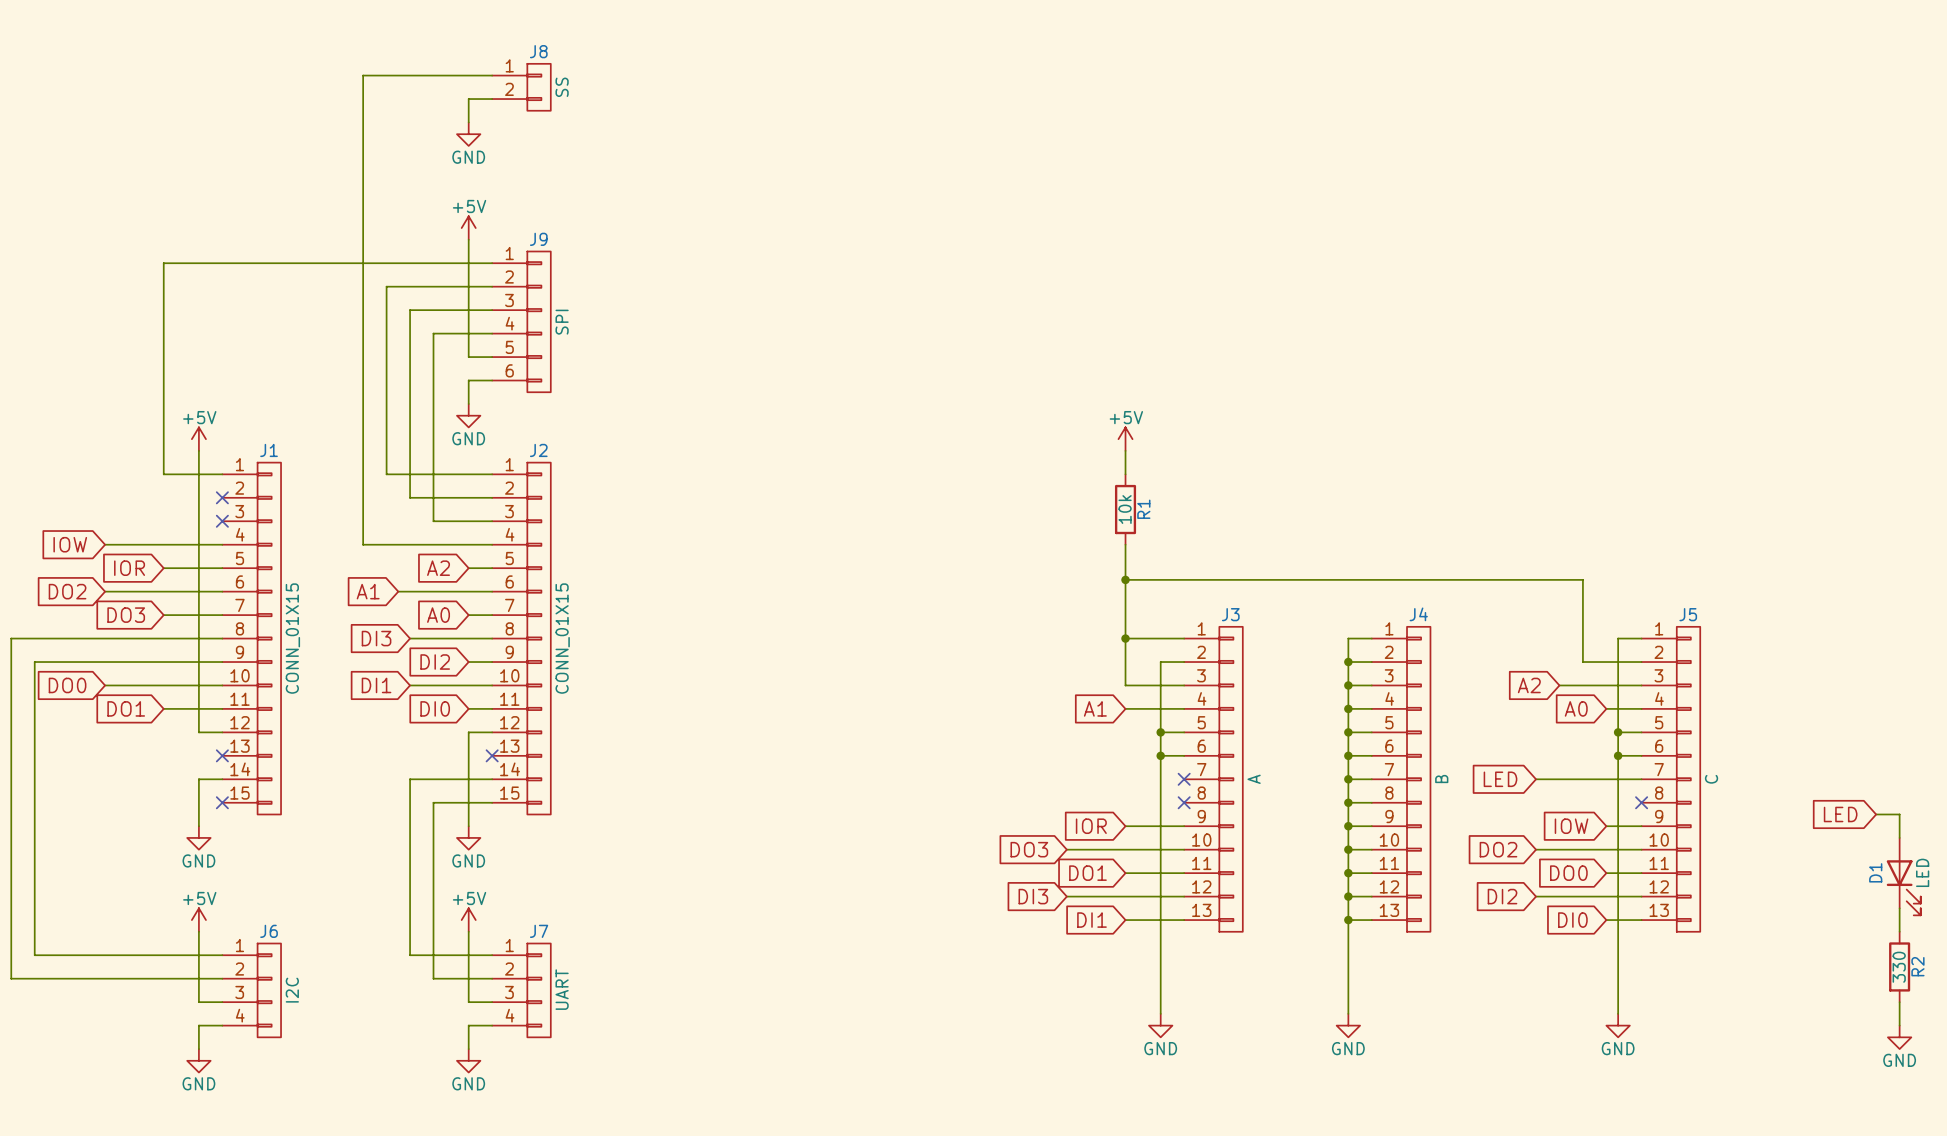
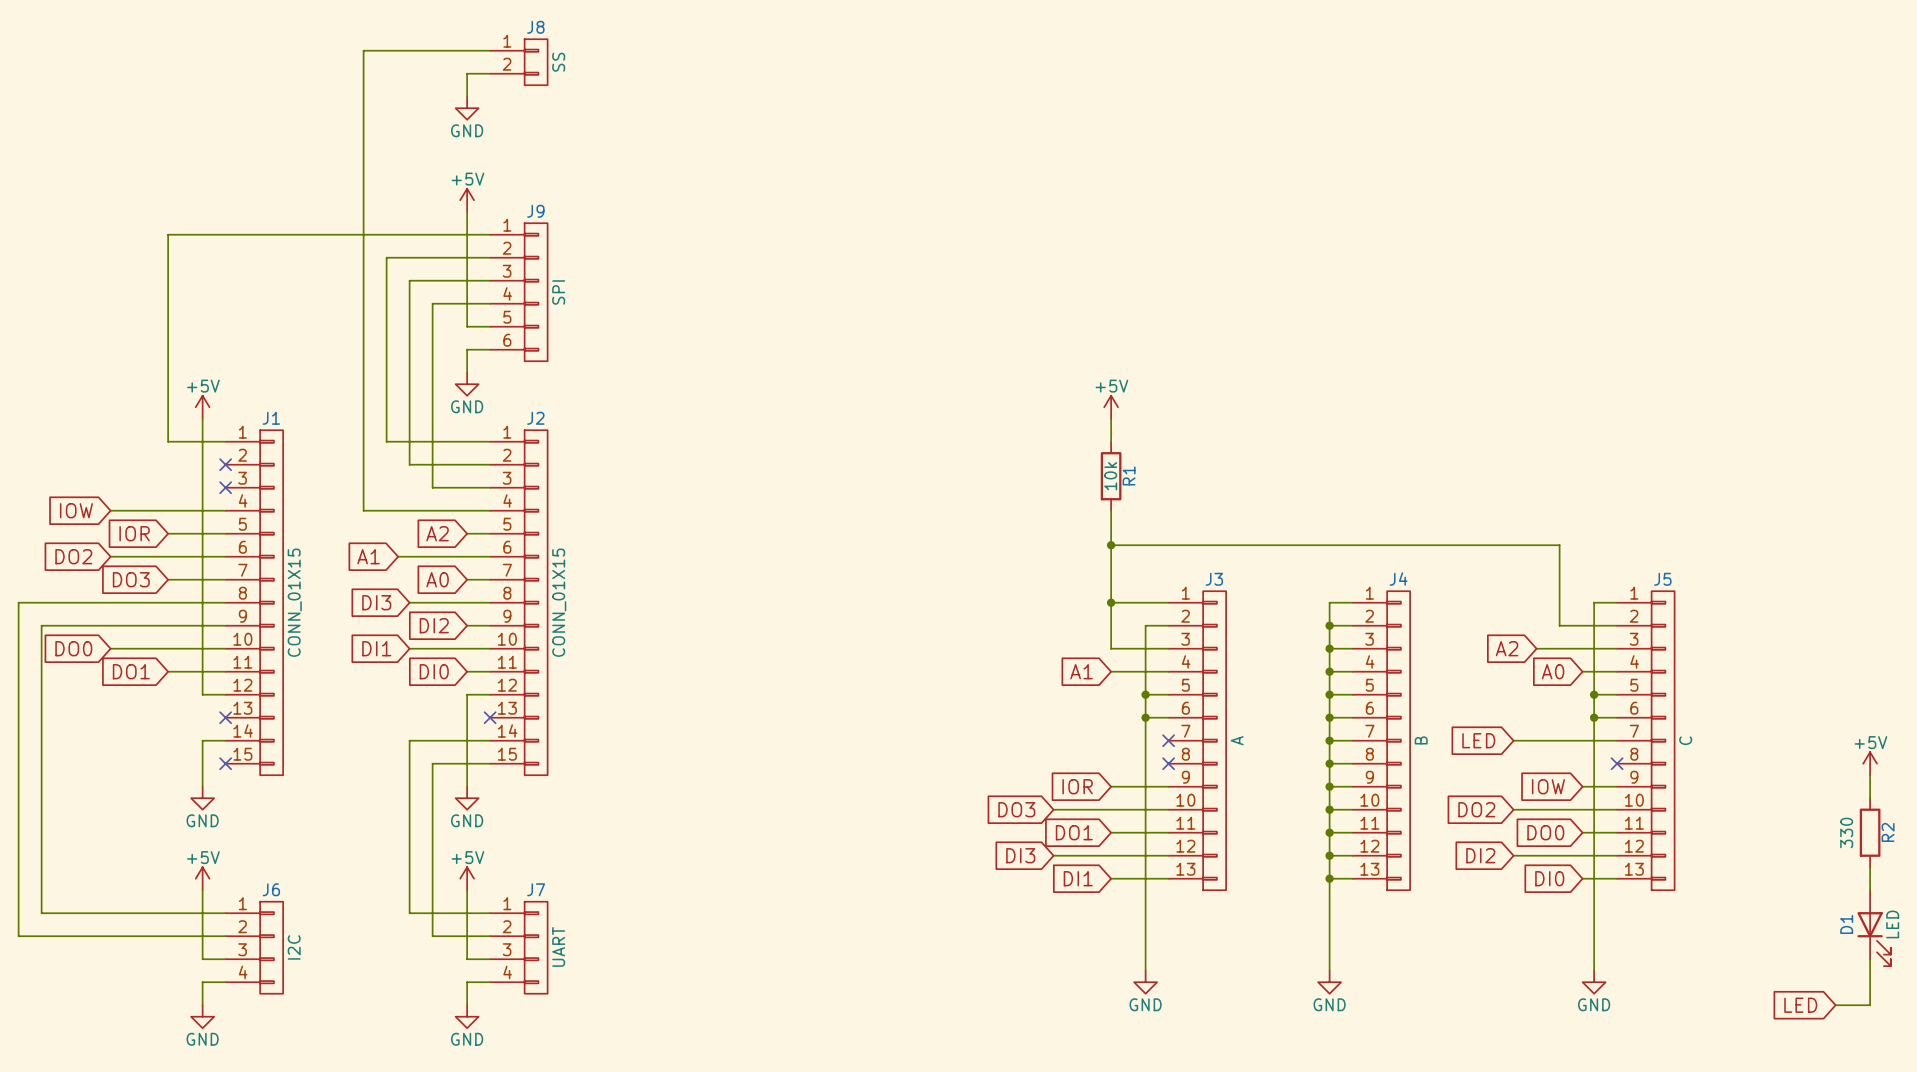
power symbol: none -> +5V (1870, 763)
global label: LED (1840, 814) -> none
wire: (1876, 814) (1899, 814) -> none
D1 position: (1903, 876) -> (1874, 928)
R2 position: (1899, 966) -> (1870, 832)
R2 value position: 330 (1899, 967) -> 330 (1846, 832)
wire: none -> (1870, 982) (1870, 1005) (1835, 1005)
power symbol: GND (1899, 1037) -> none
global label: none -> LED (1800, 1005)

